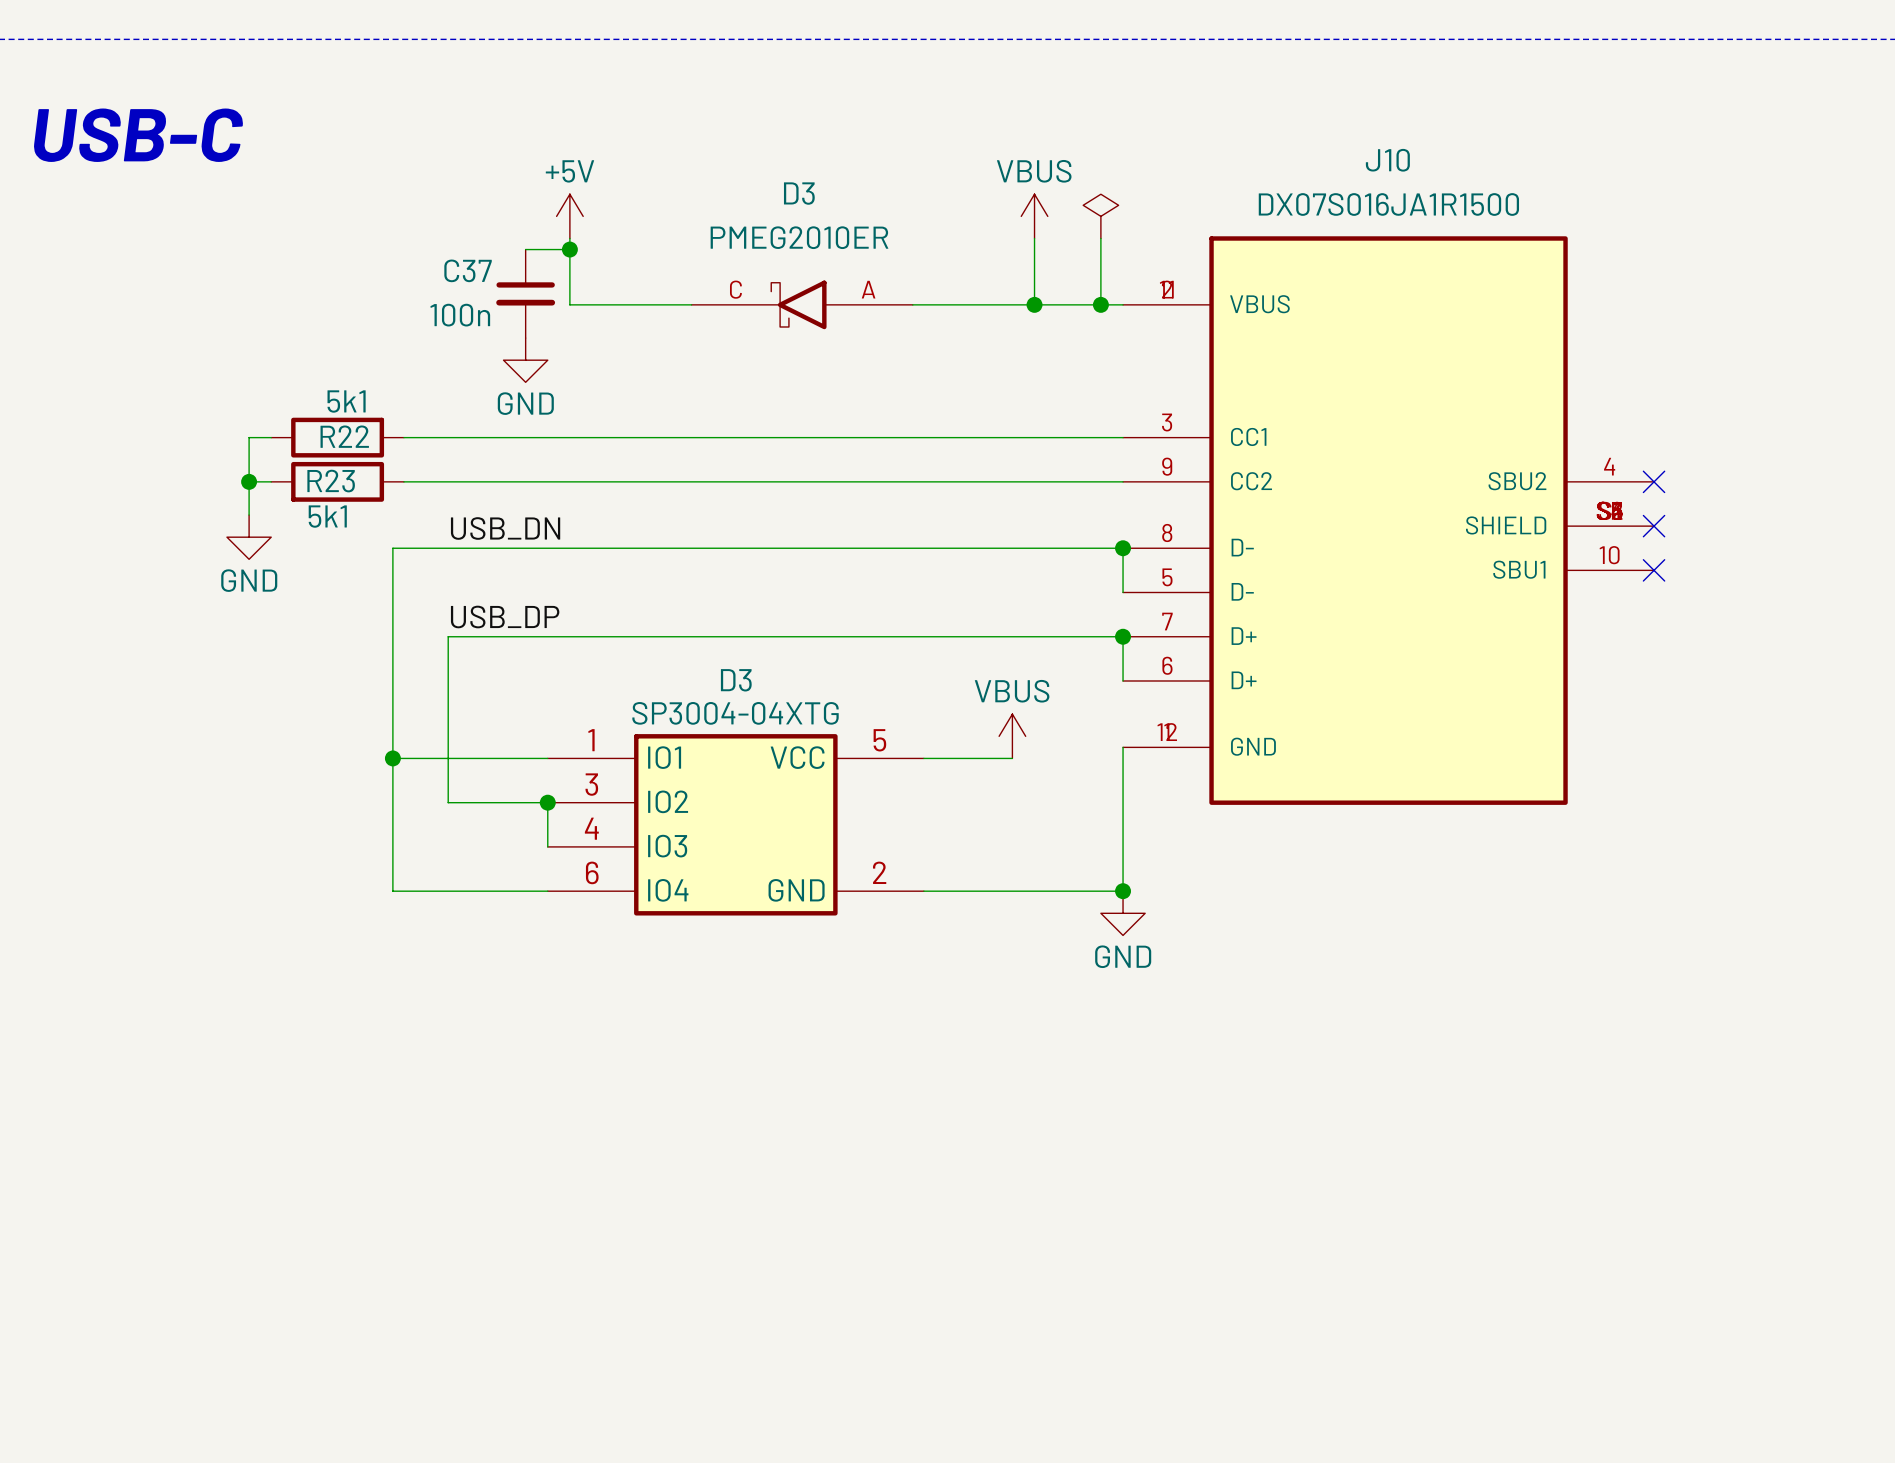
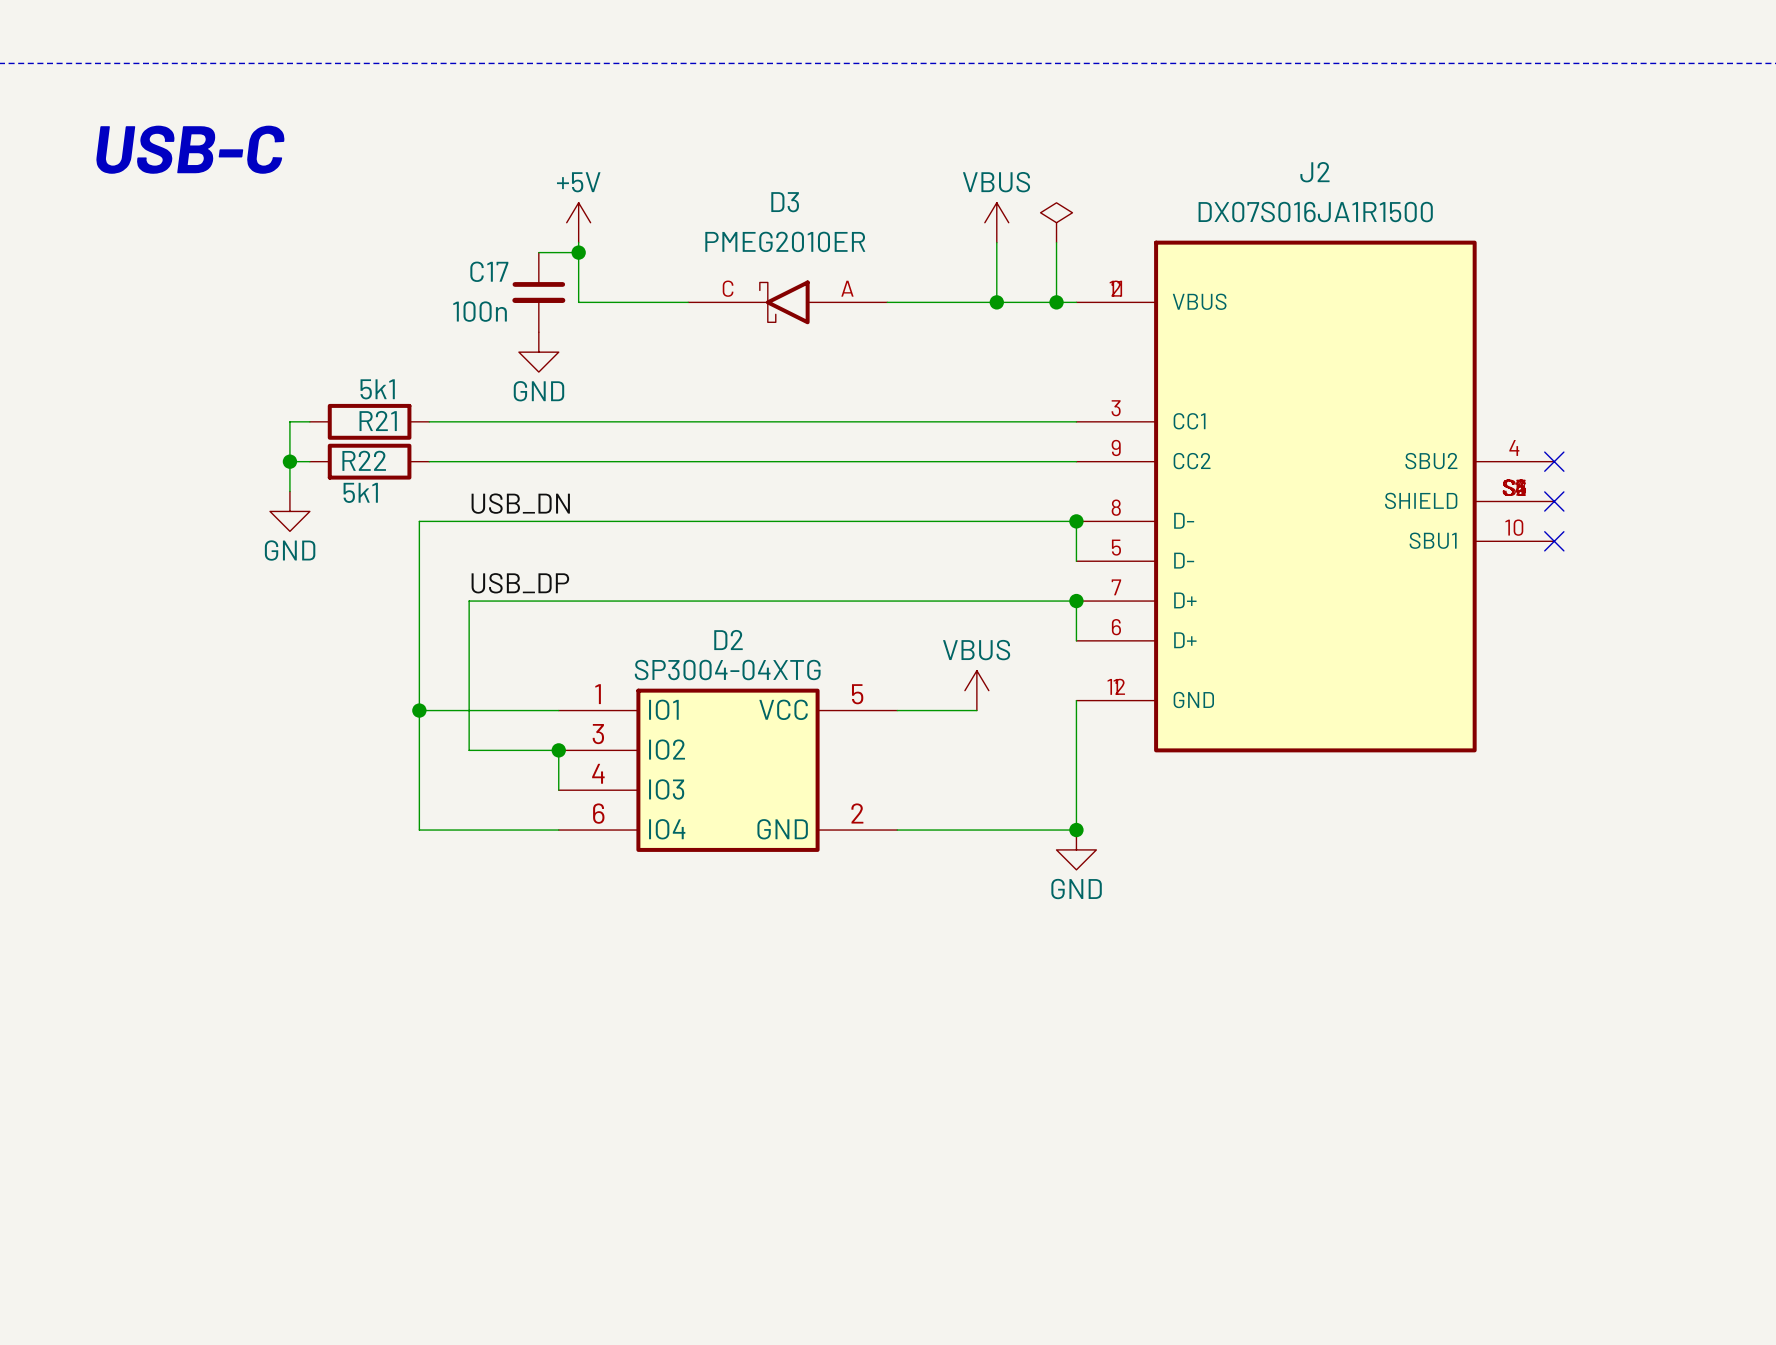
J10 name: J10 (1387, 160) -> J2 (1314, 172)
C37 name: C37 (468, 270) -> C17 (489, 271)
R22 name: R22 (344, 436) -> R21 (378, 420)
R23 name: R23 (331, 481) -> R22 (364, 460)
D3 name: D3 (736, 680) -> D2 (728, 640)

